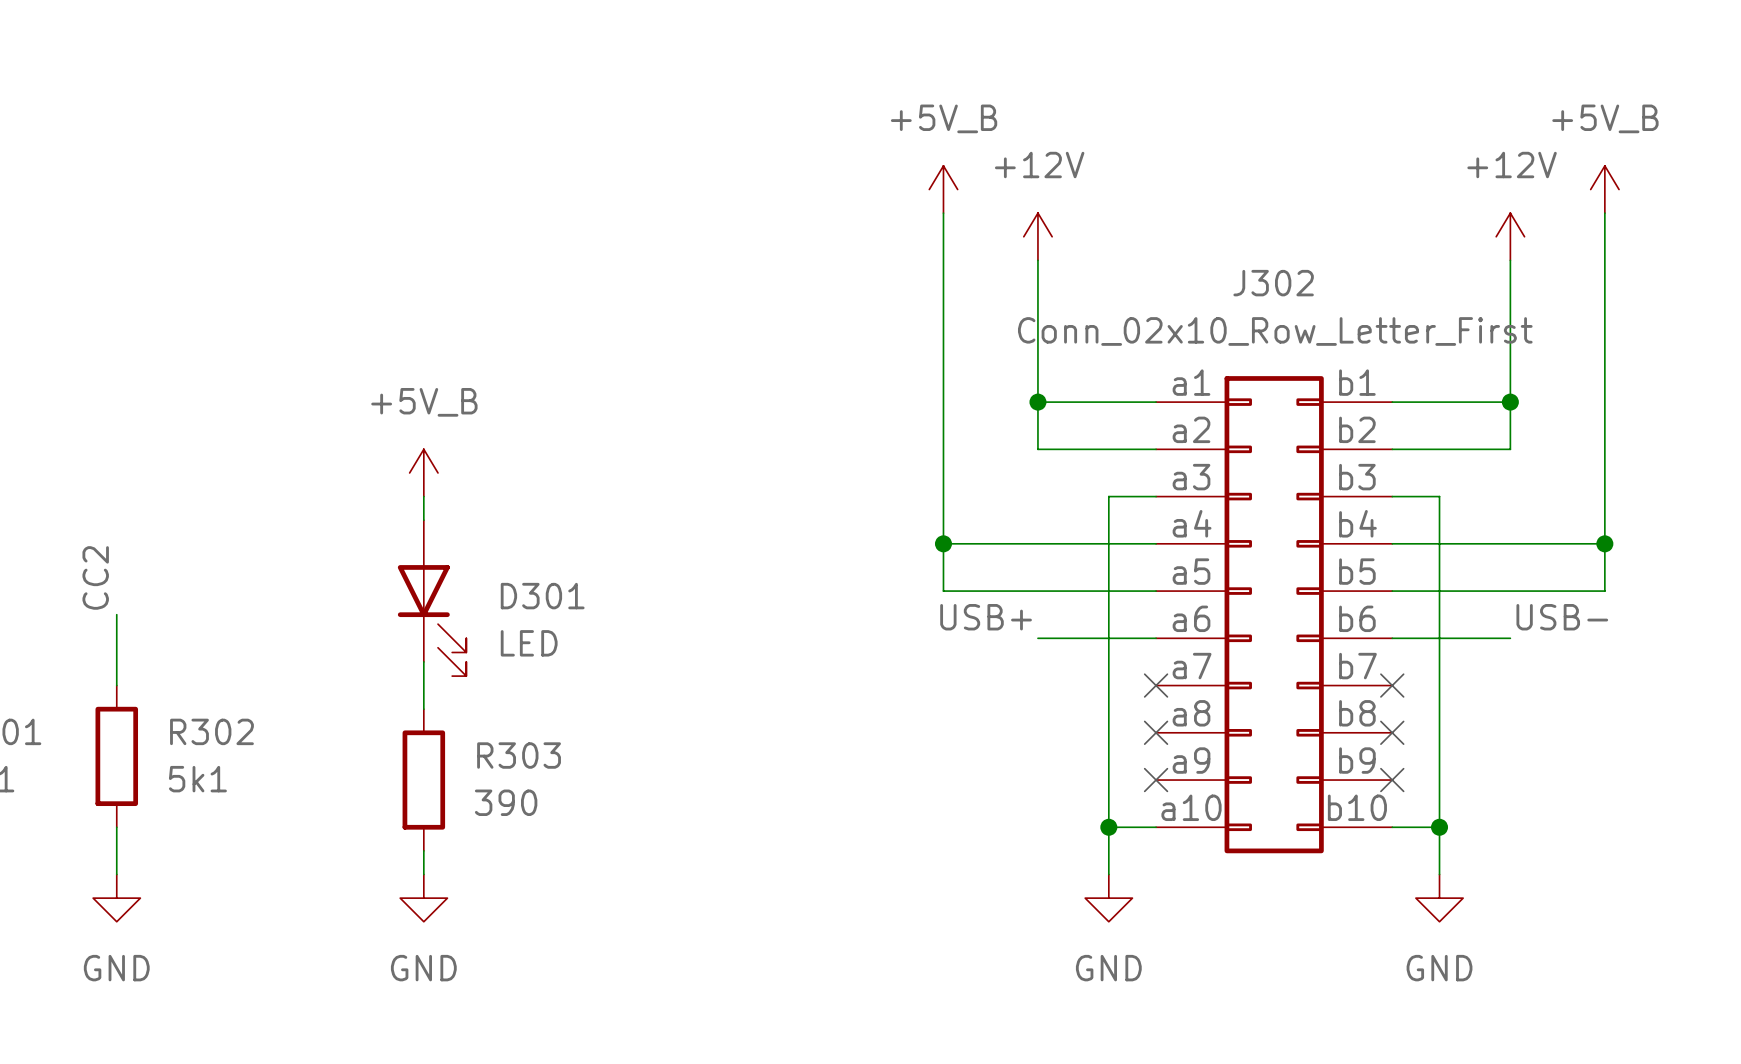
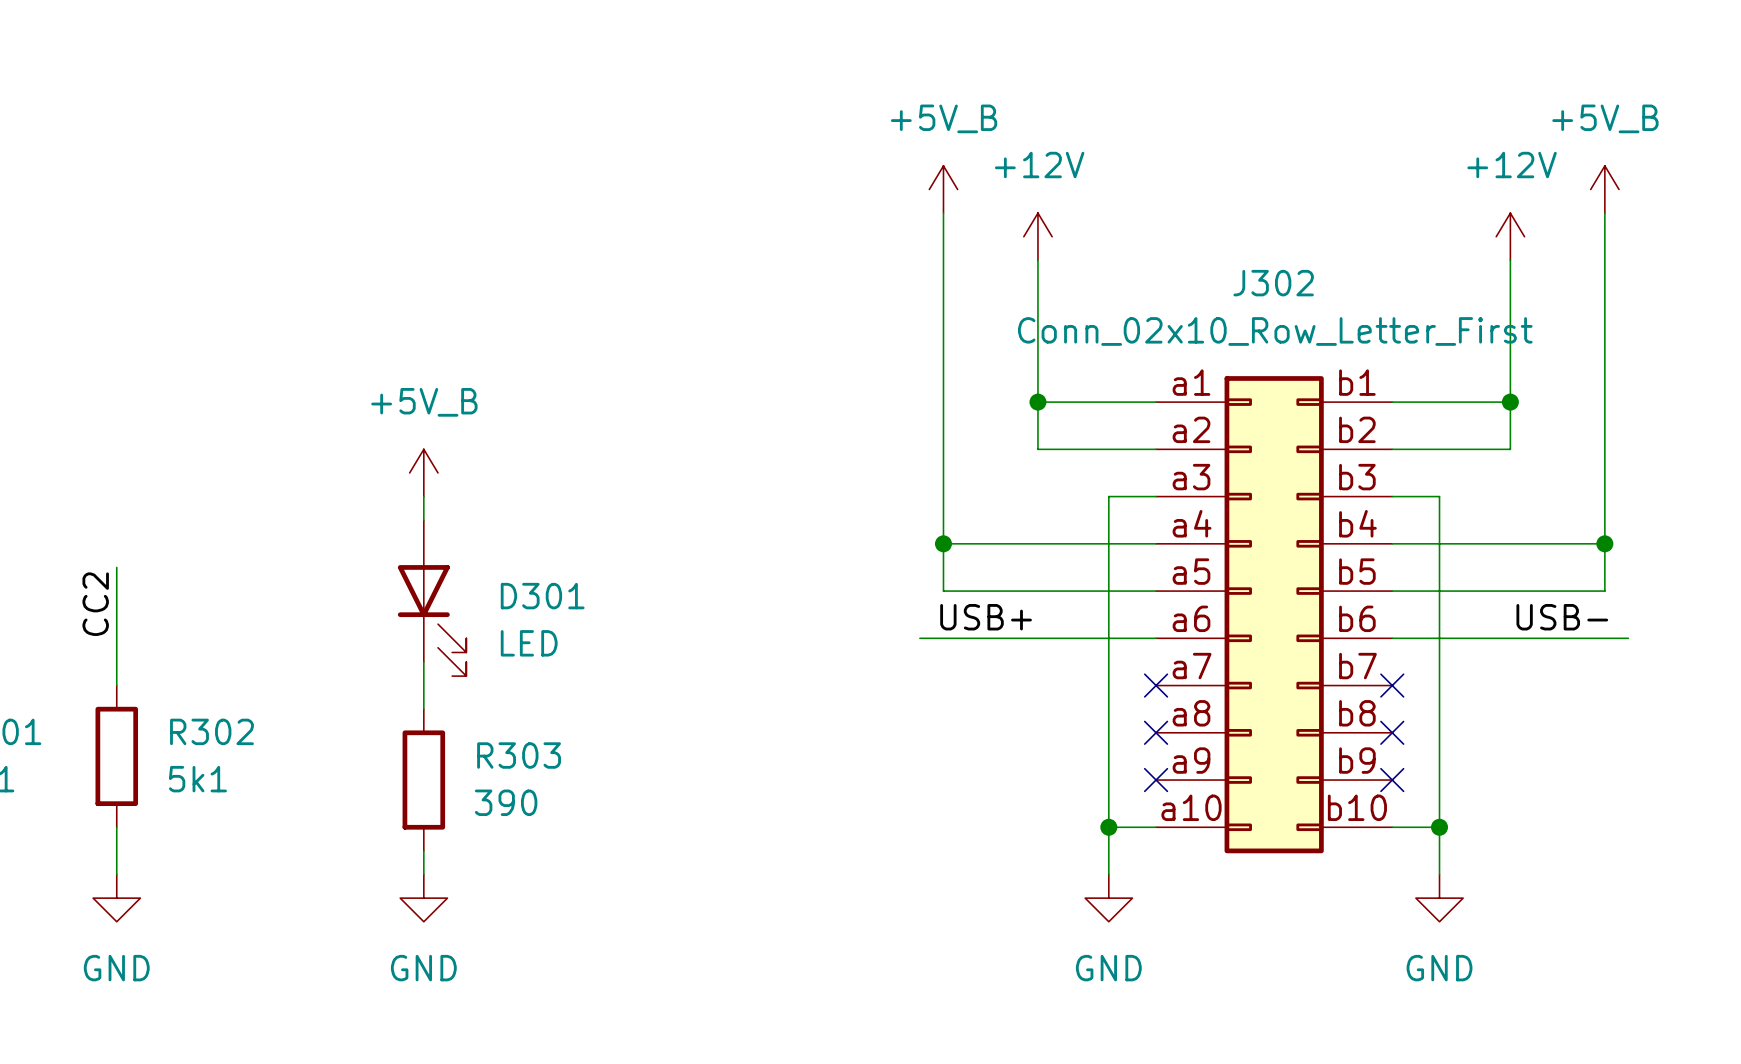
wire: none -> (116, 567) (116, 614)
label position: CC2 (95, 577) -> CC2 (95, 604)
wire: none -> (919, 638) (1037, 638)
wire: none -> (1510, 638) (1628, 638)

